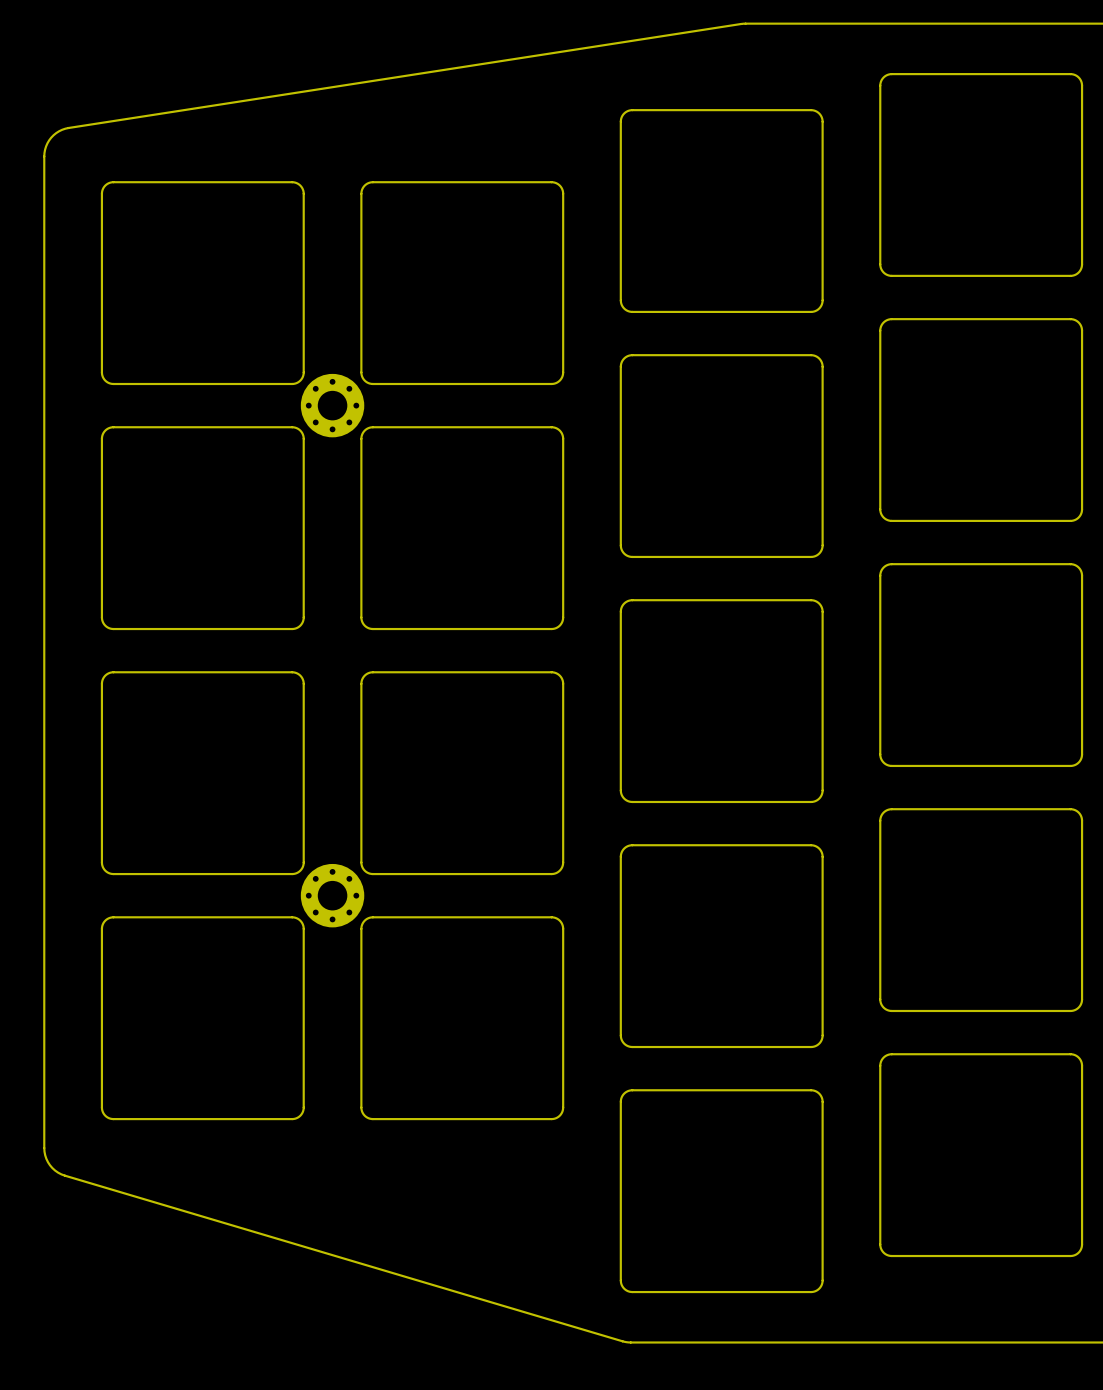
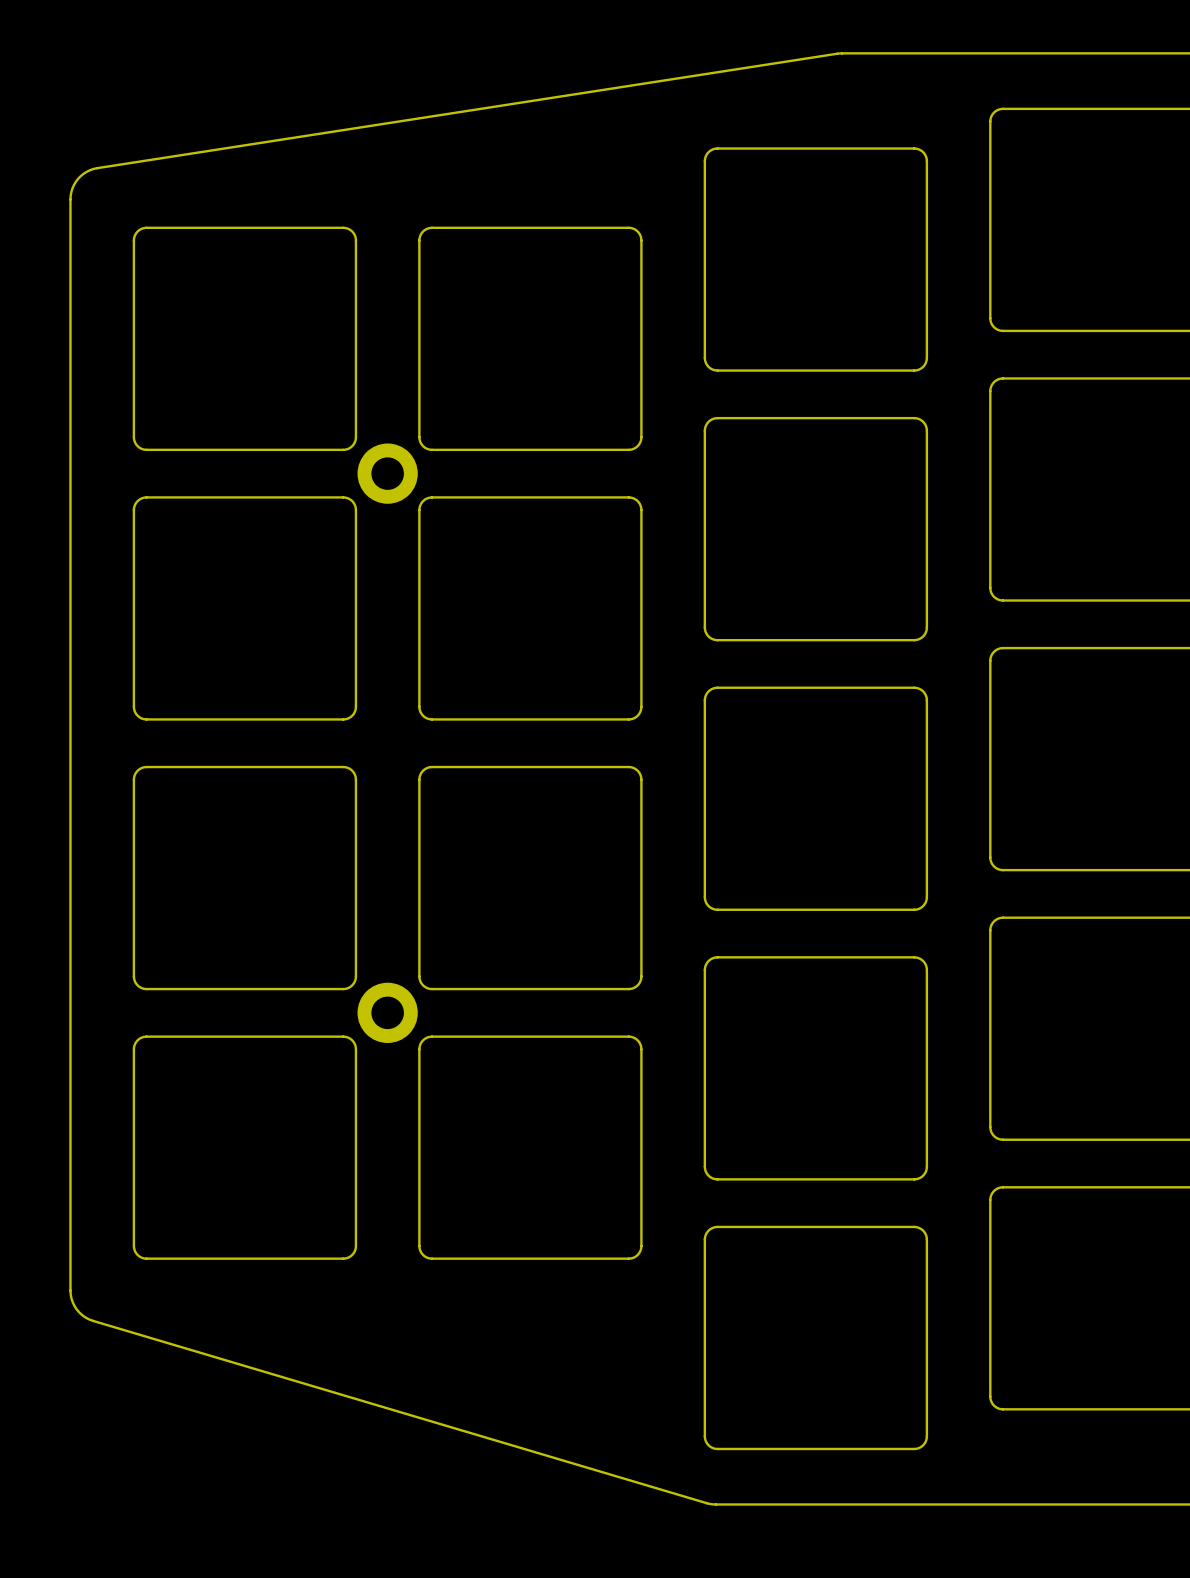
part footprint: [300, 373, 365, 438] -> [357, 443, 418, 504]
part footprint: [300, 863, 365, 928] -> [357, 982, 418, 1043]

